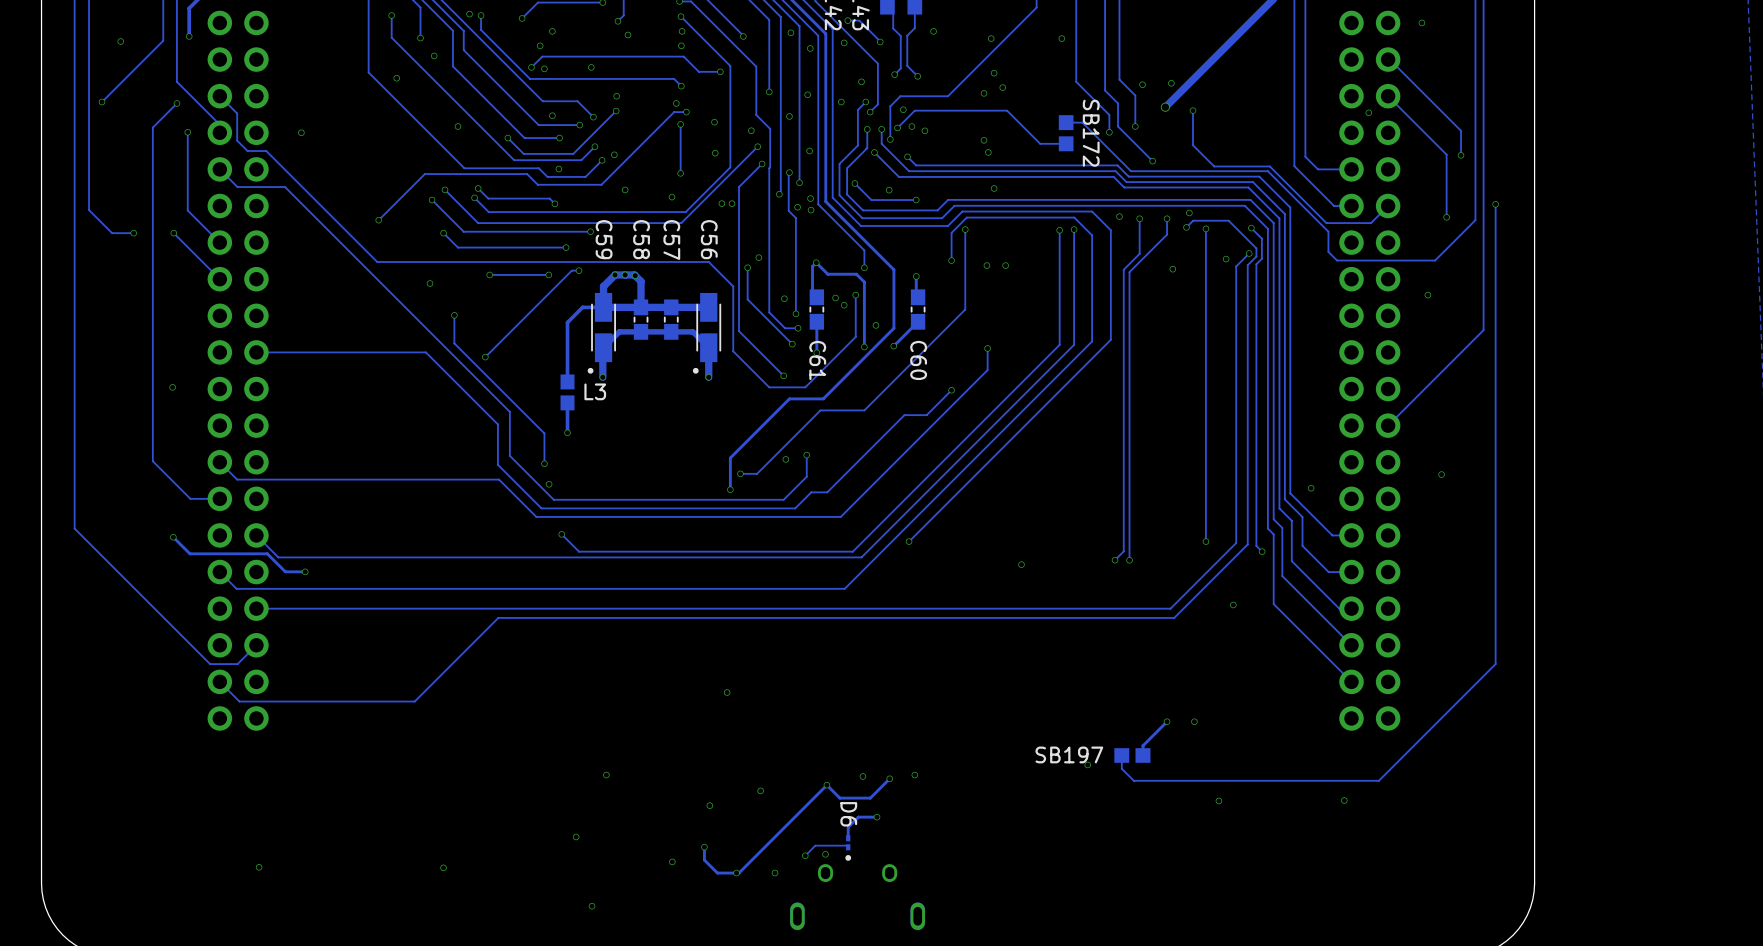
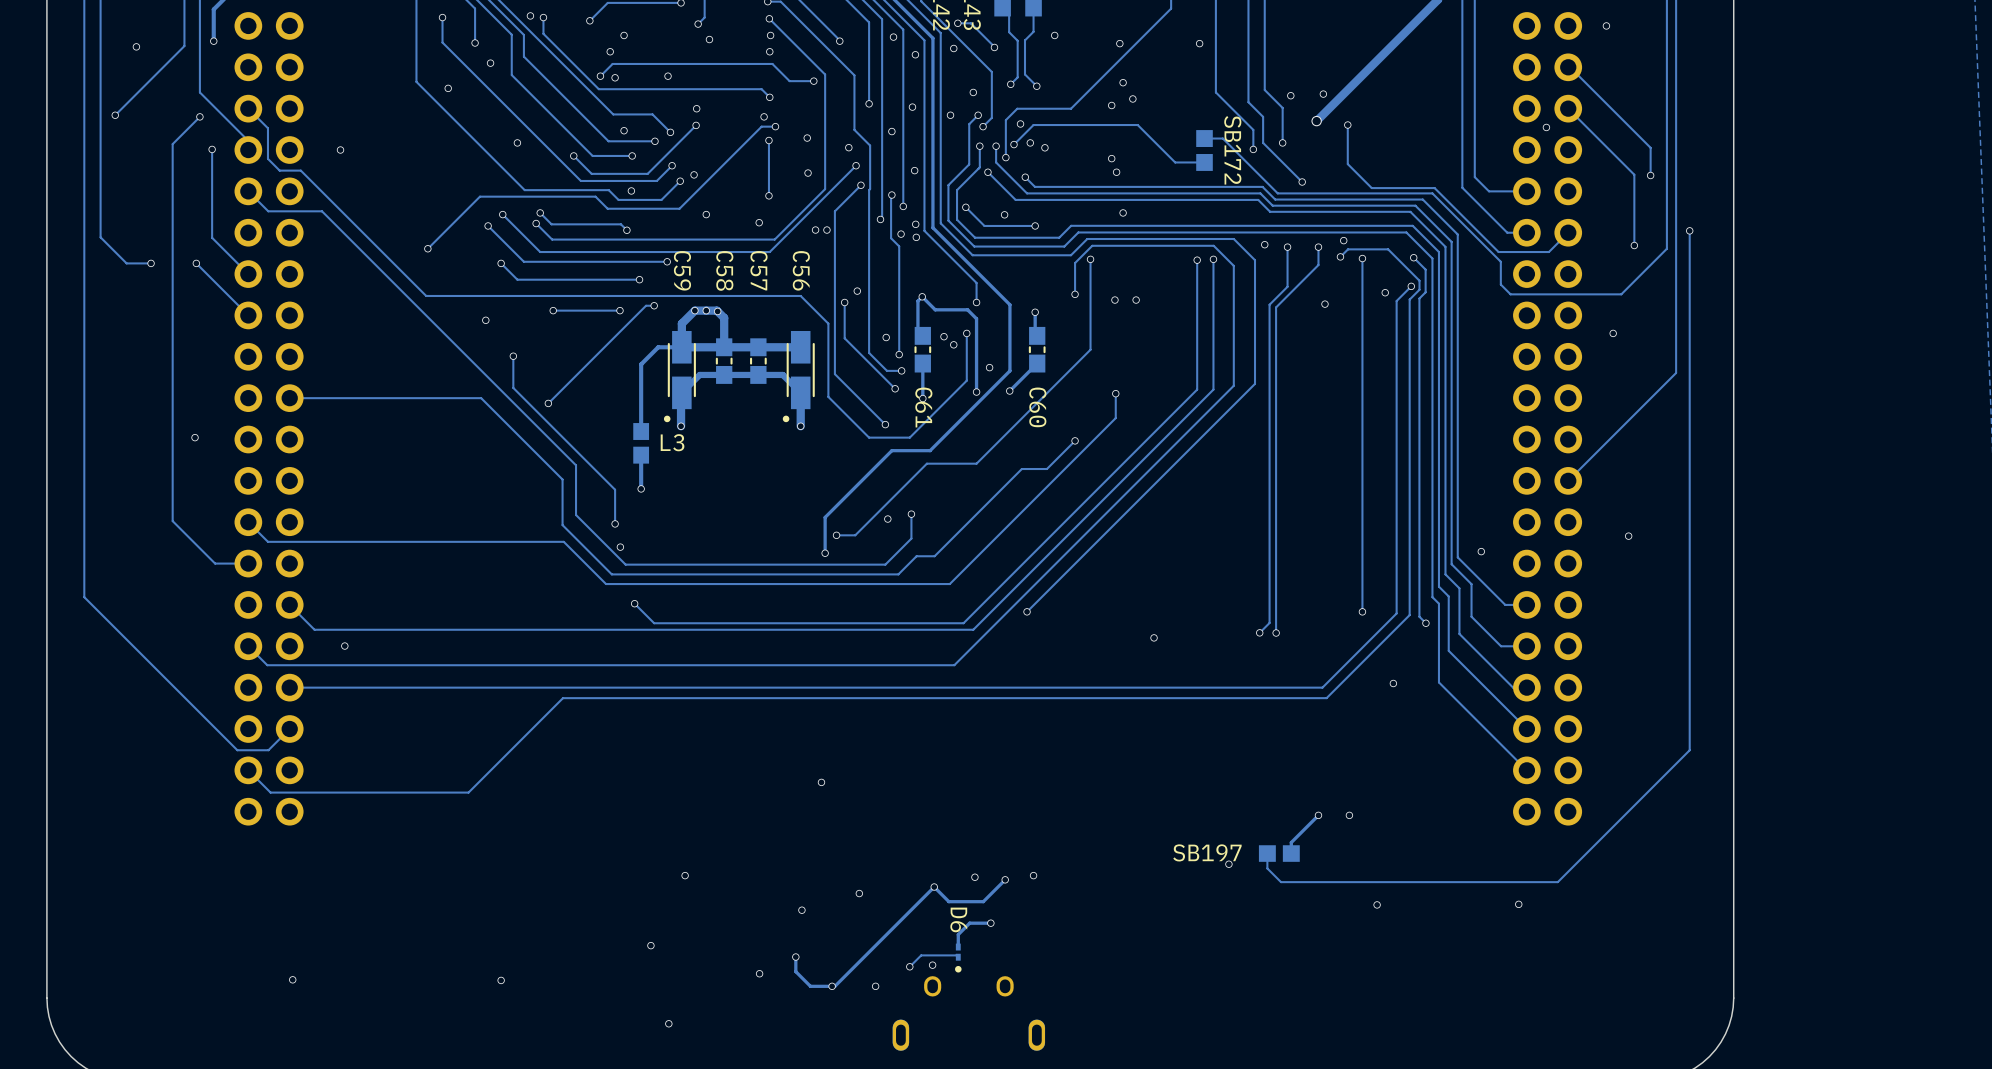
track: (173, 537) (189, 553) (267, 553) (285, 571) (305, 571) -> none
via: (173, 537) -> none

